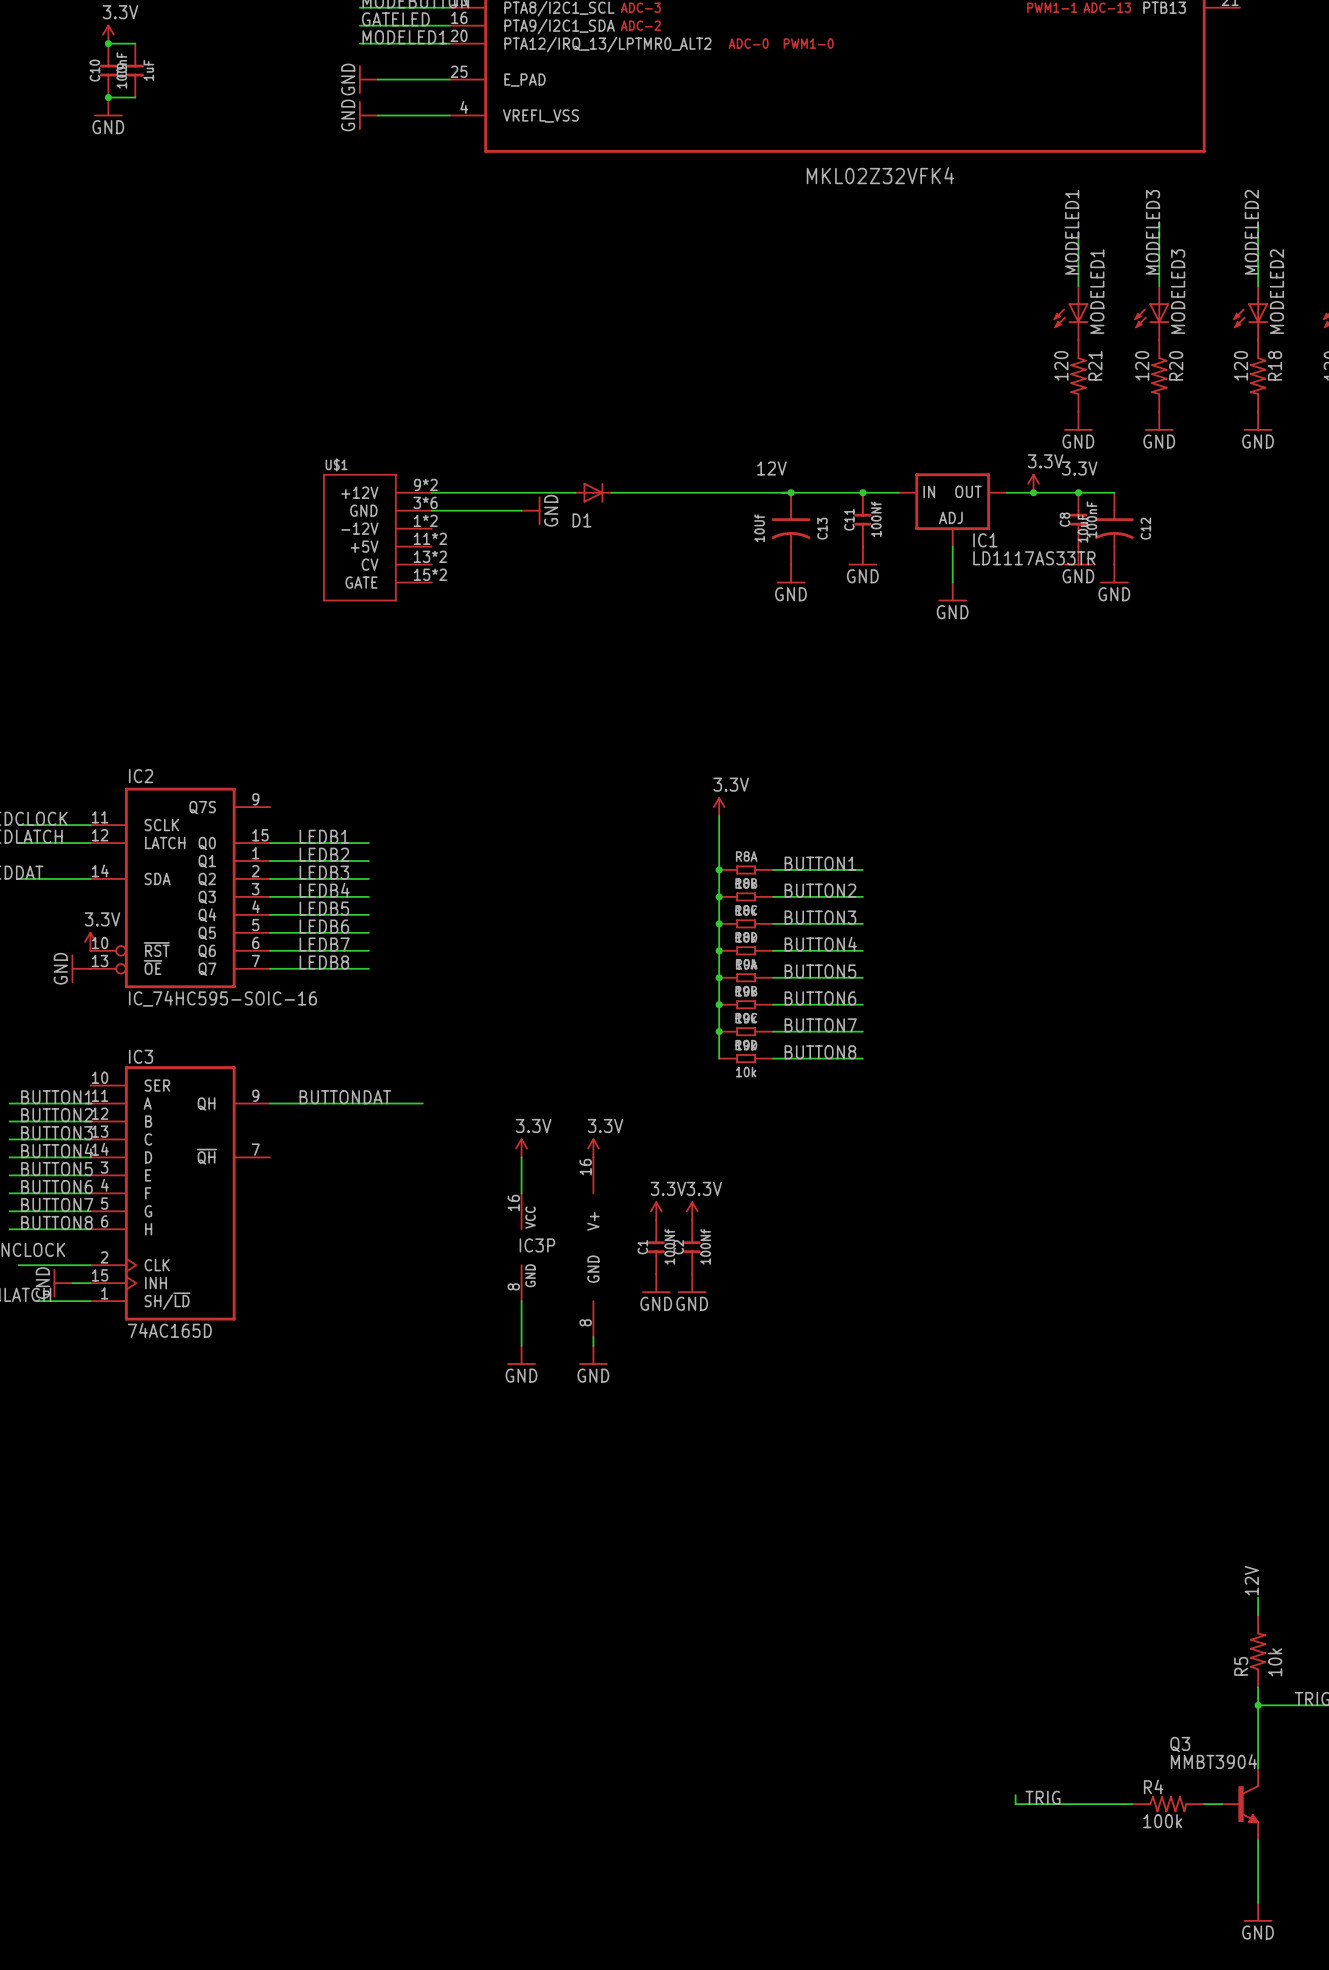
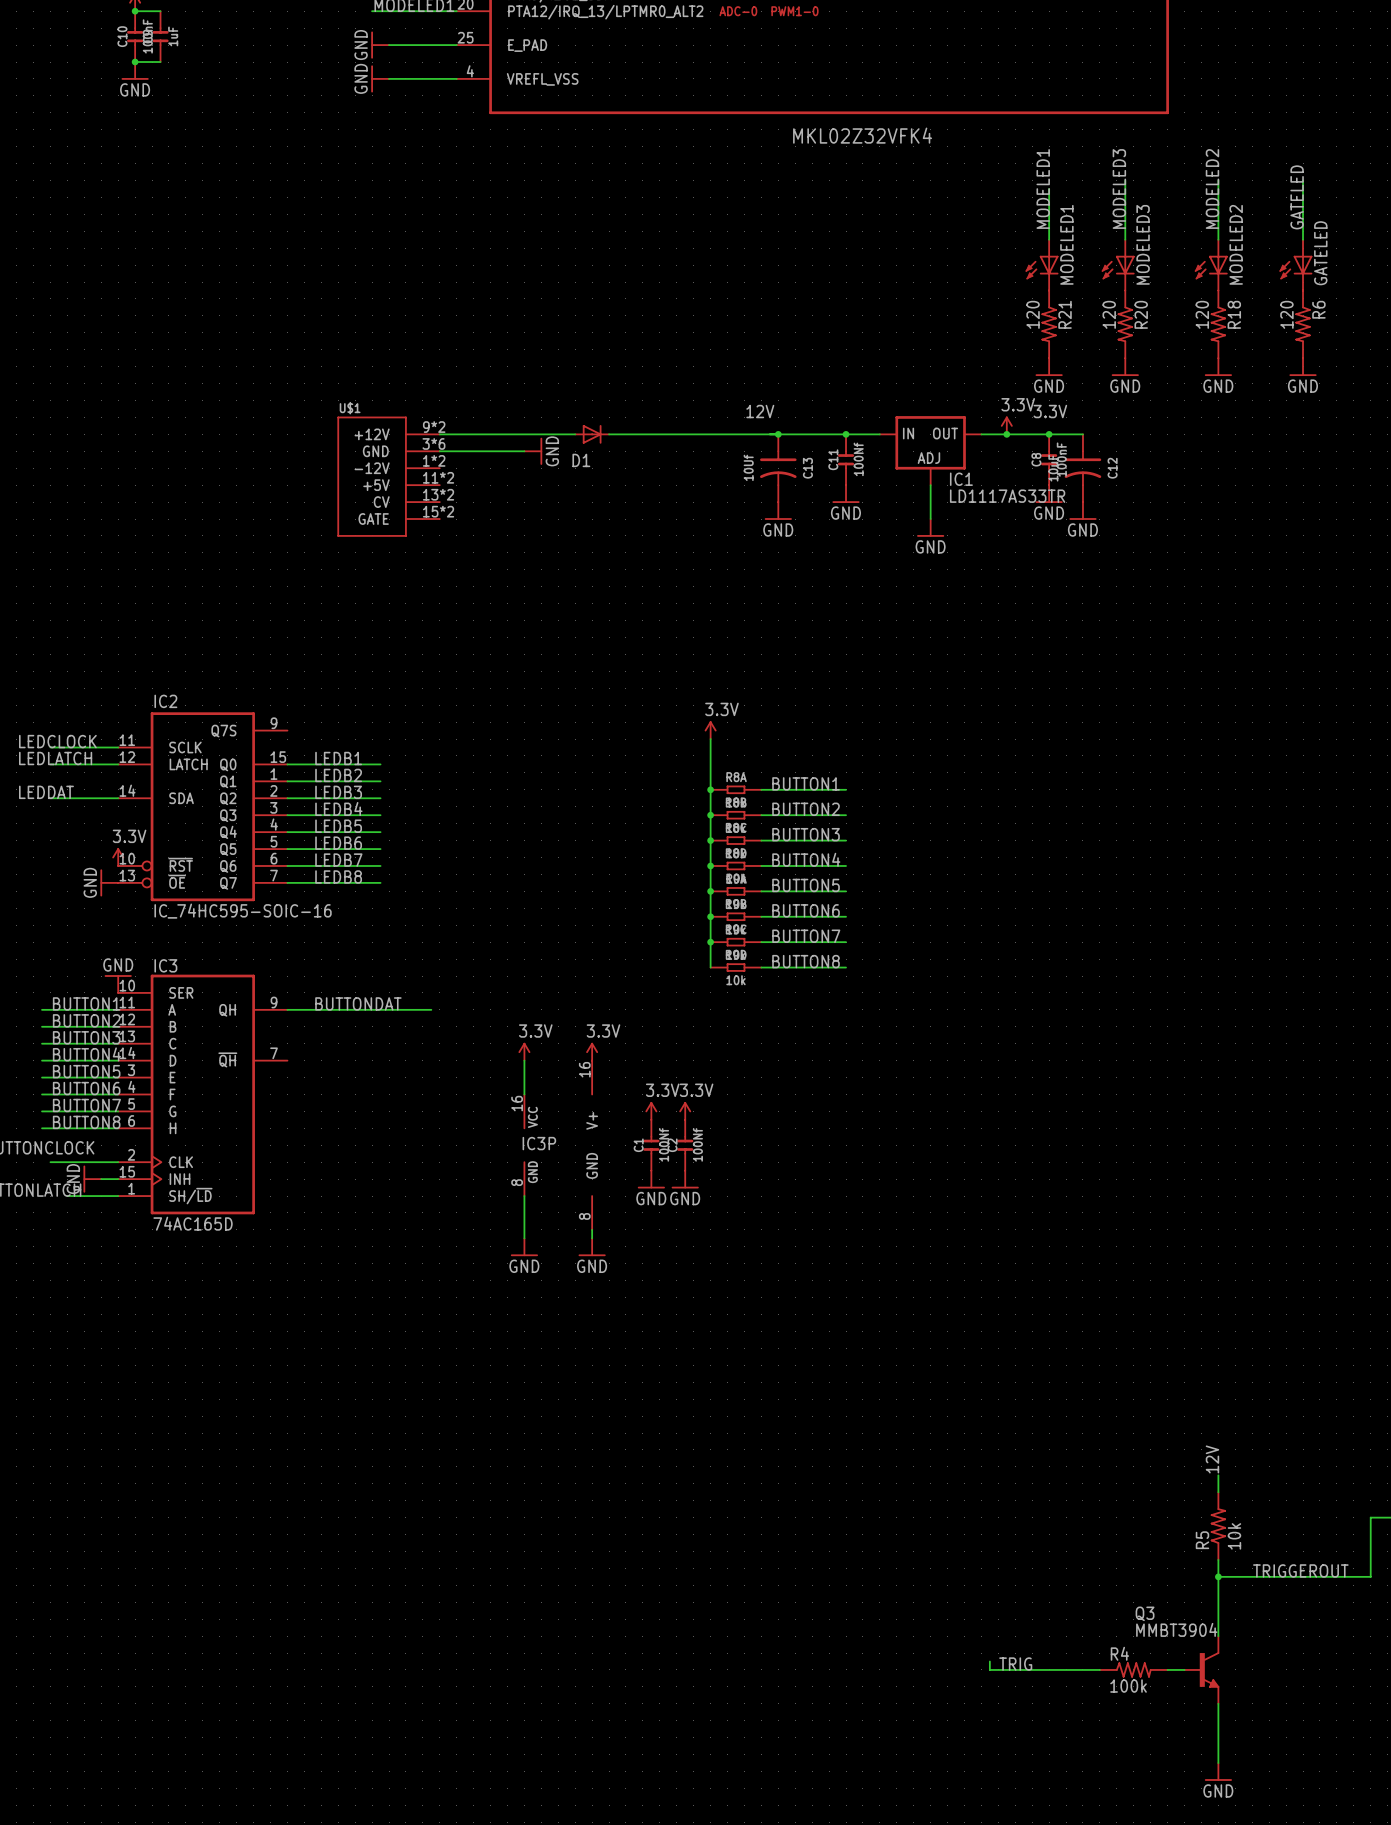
power symbol: none -> GND (118, 984)

